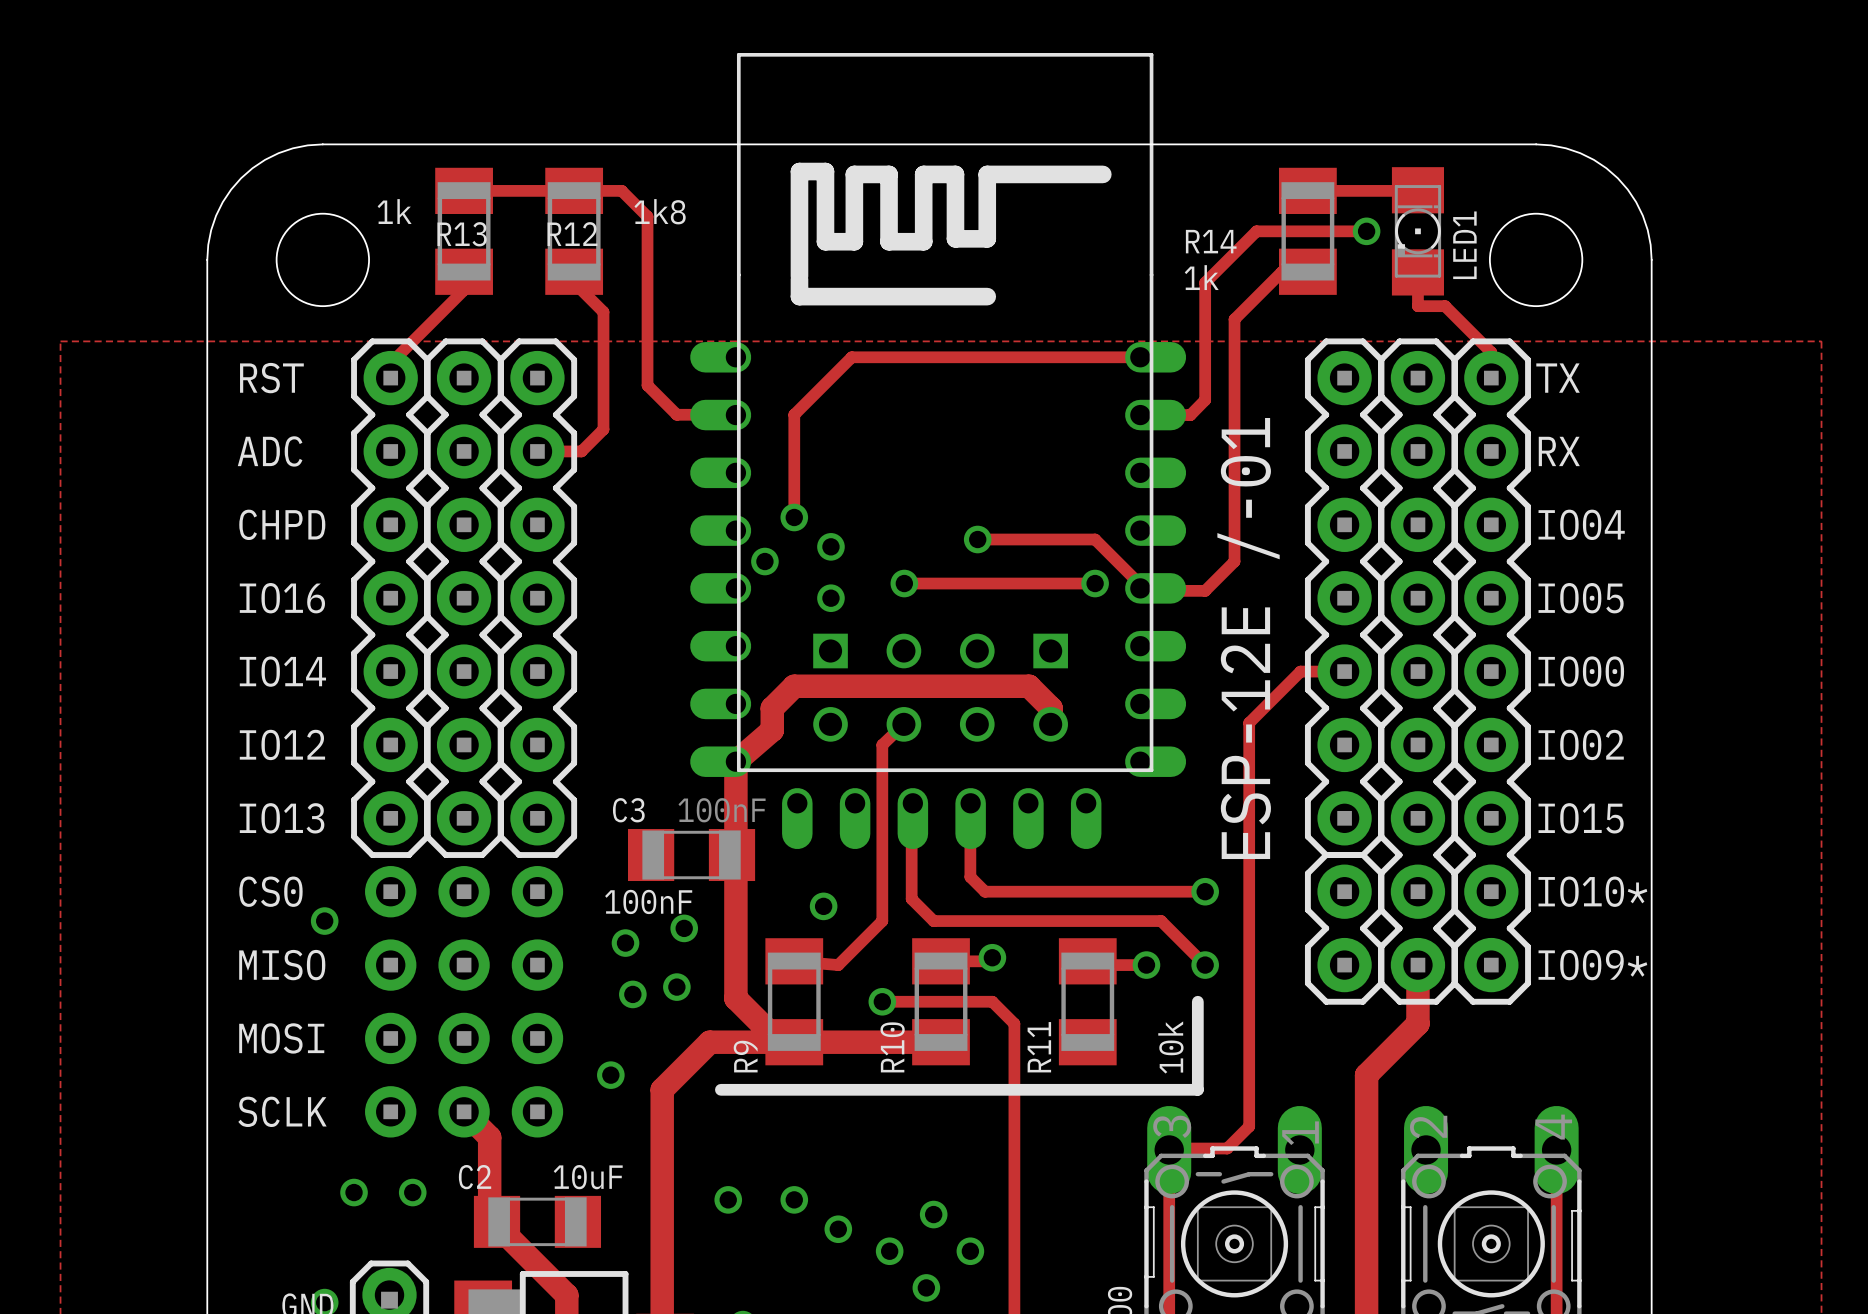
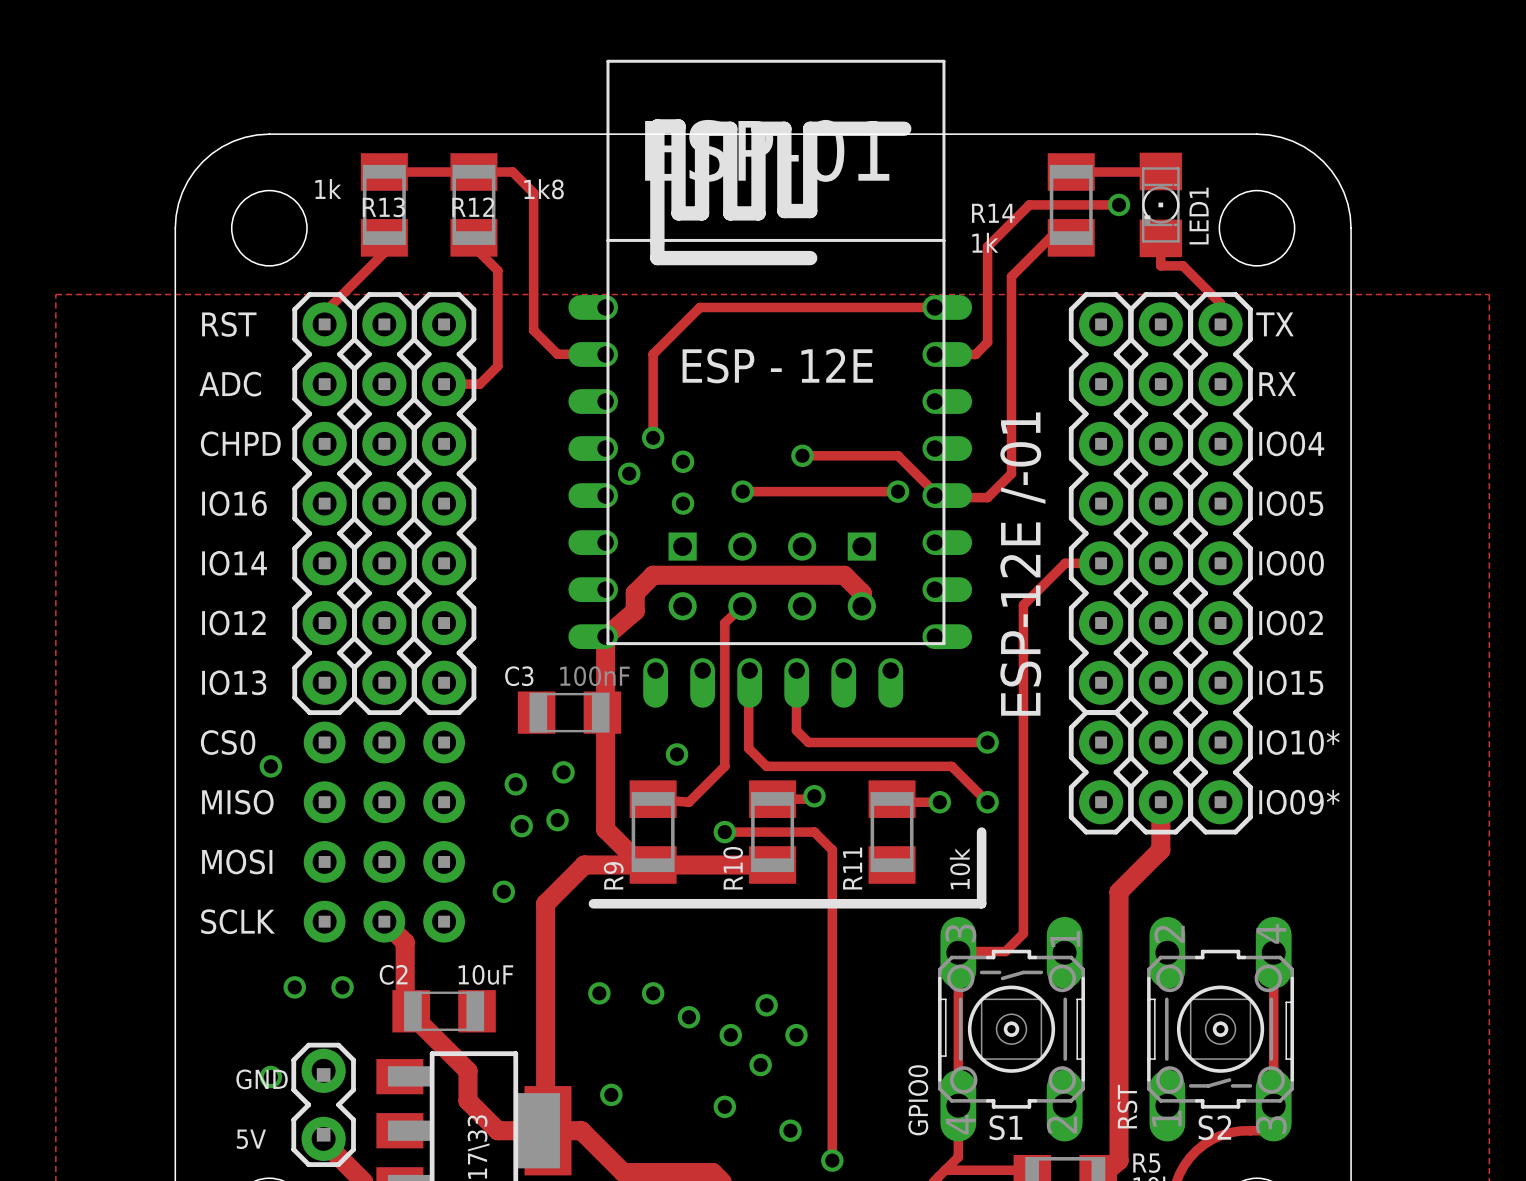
part footprint: [736, 52, 1154, 773] -> [606, 59, 946, 646]
part footprint: [690, 162, 1187, 850] -> [568, 119, 973, 708]
text: 100nF (648, 901) -> none

